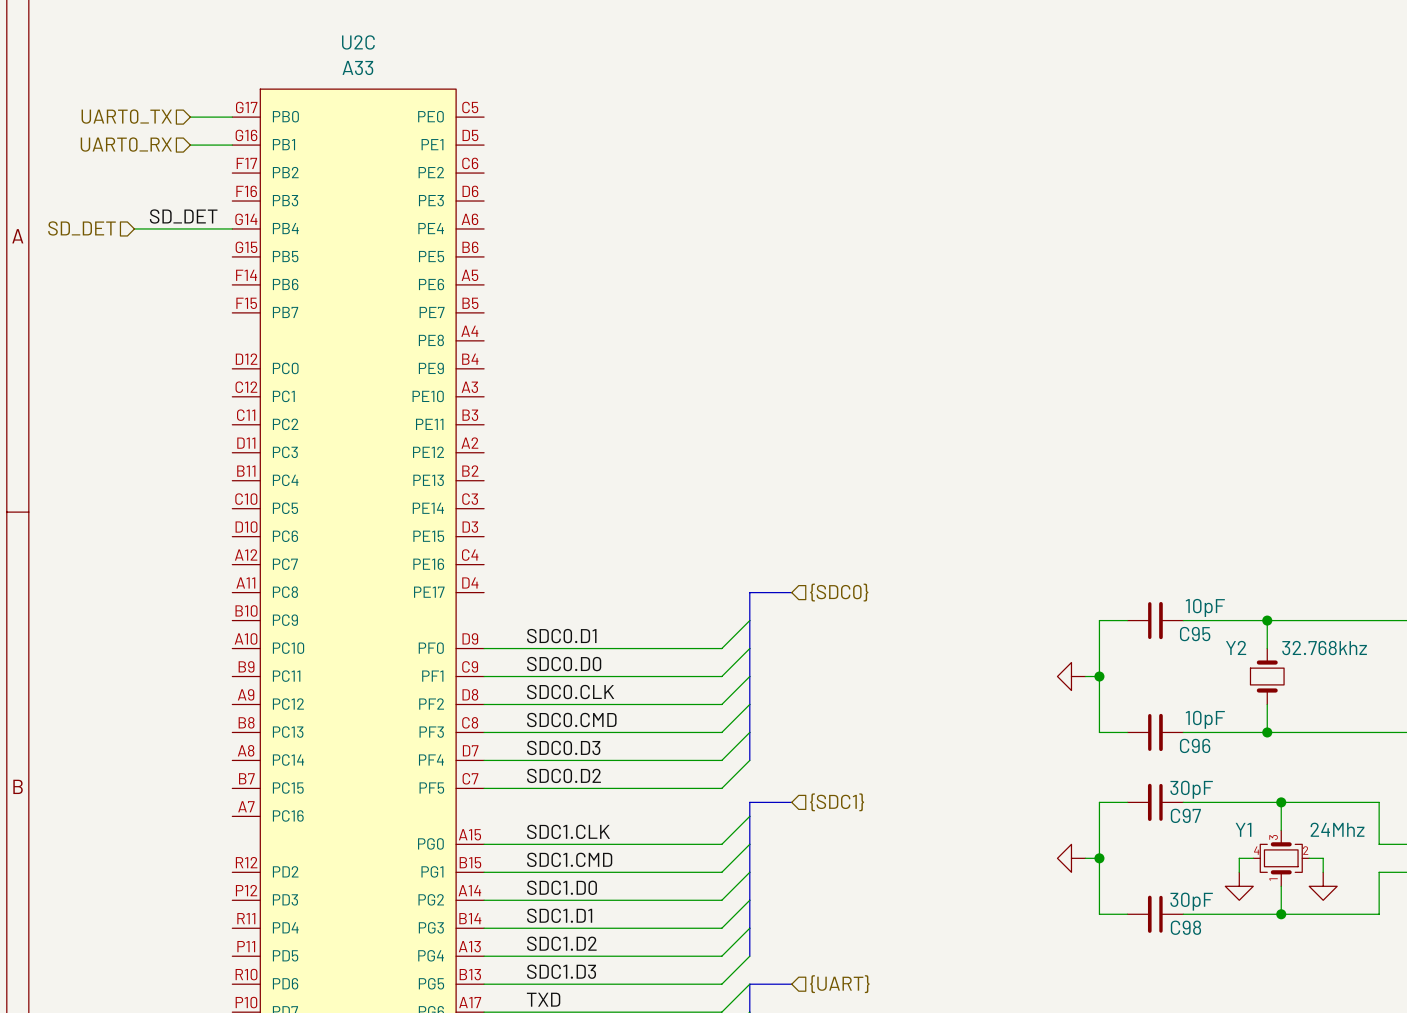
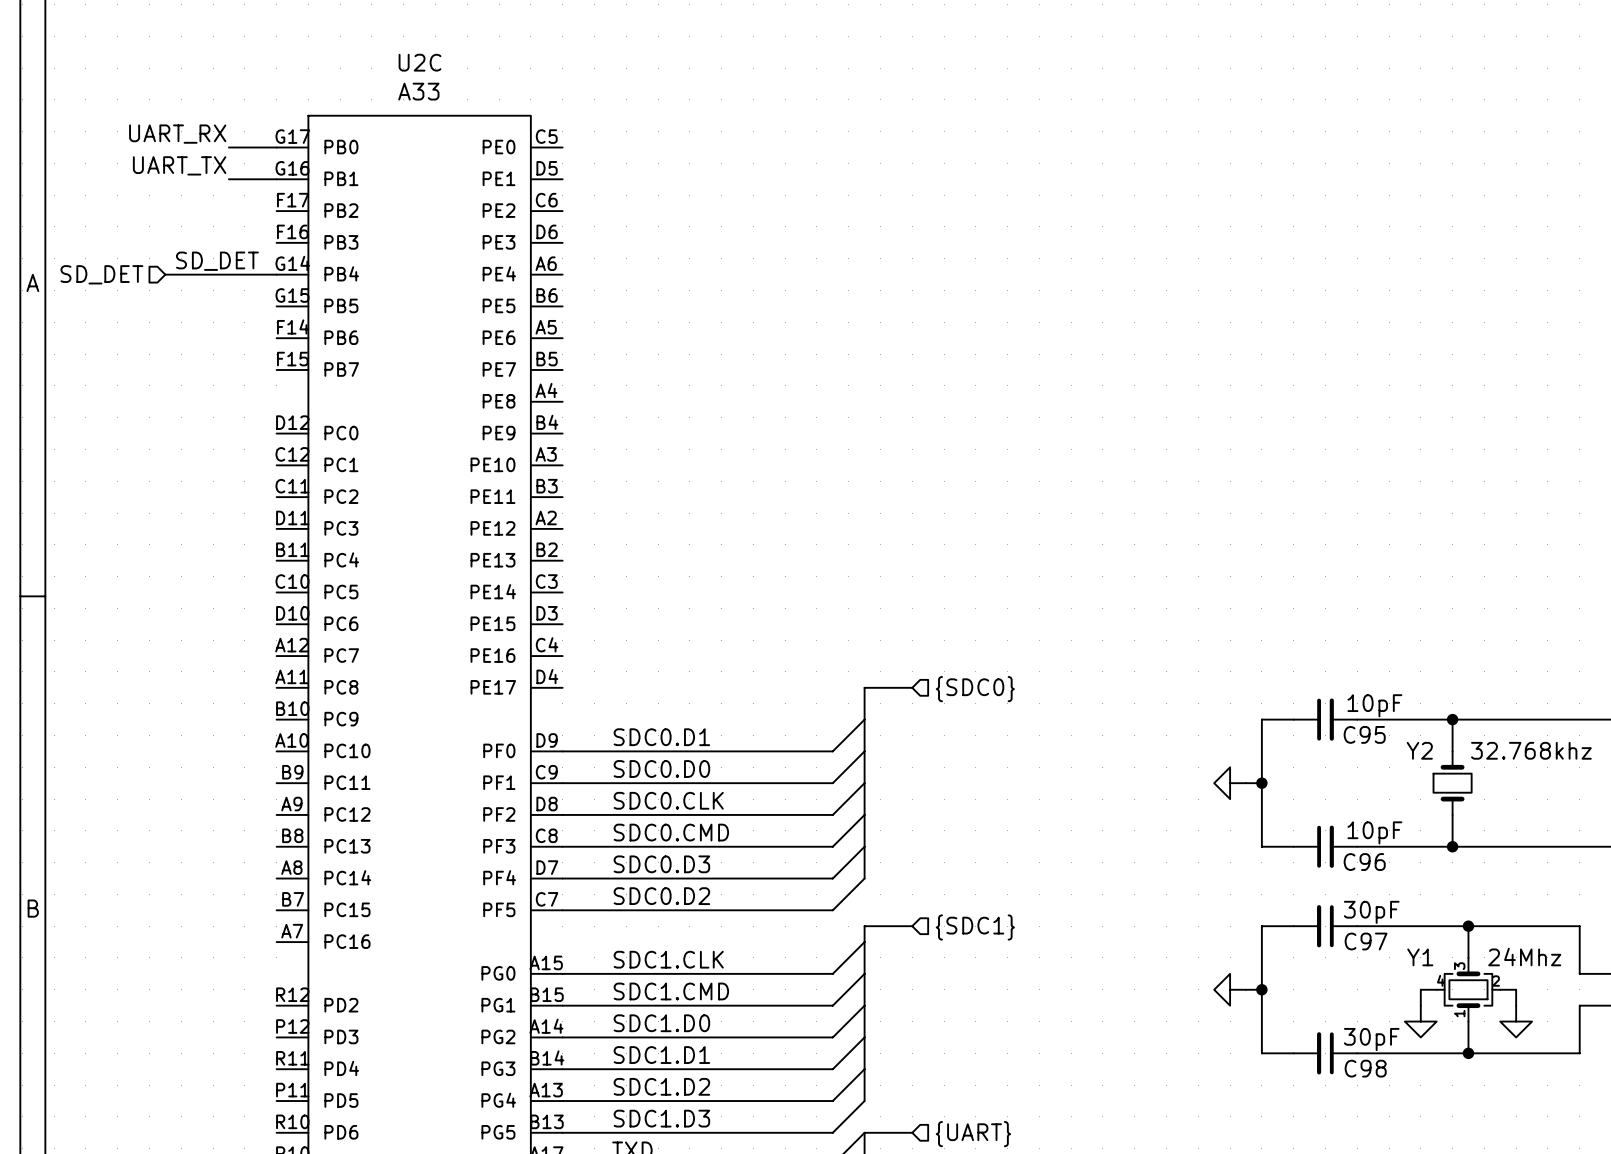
label: none -> UART_RX (177, 134)
hierarchical label: UART0_TX (126, 116) -> none
label: none -> UART_TX (179, 165)
hierarchical label: UART0_RX (126, 144) -> none

